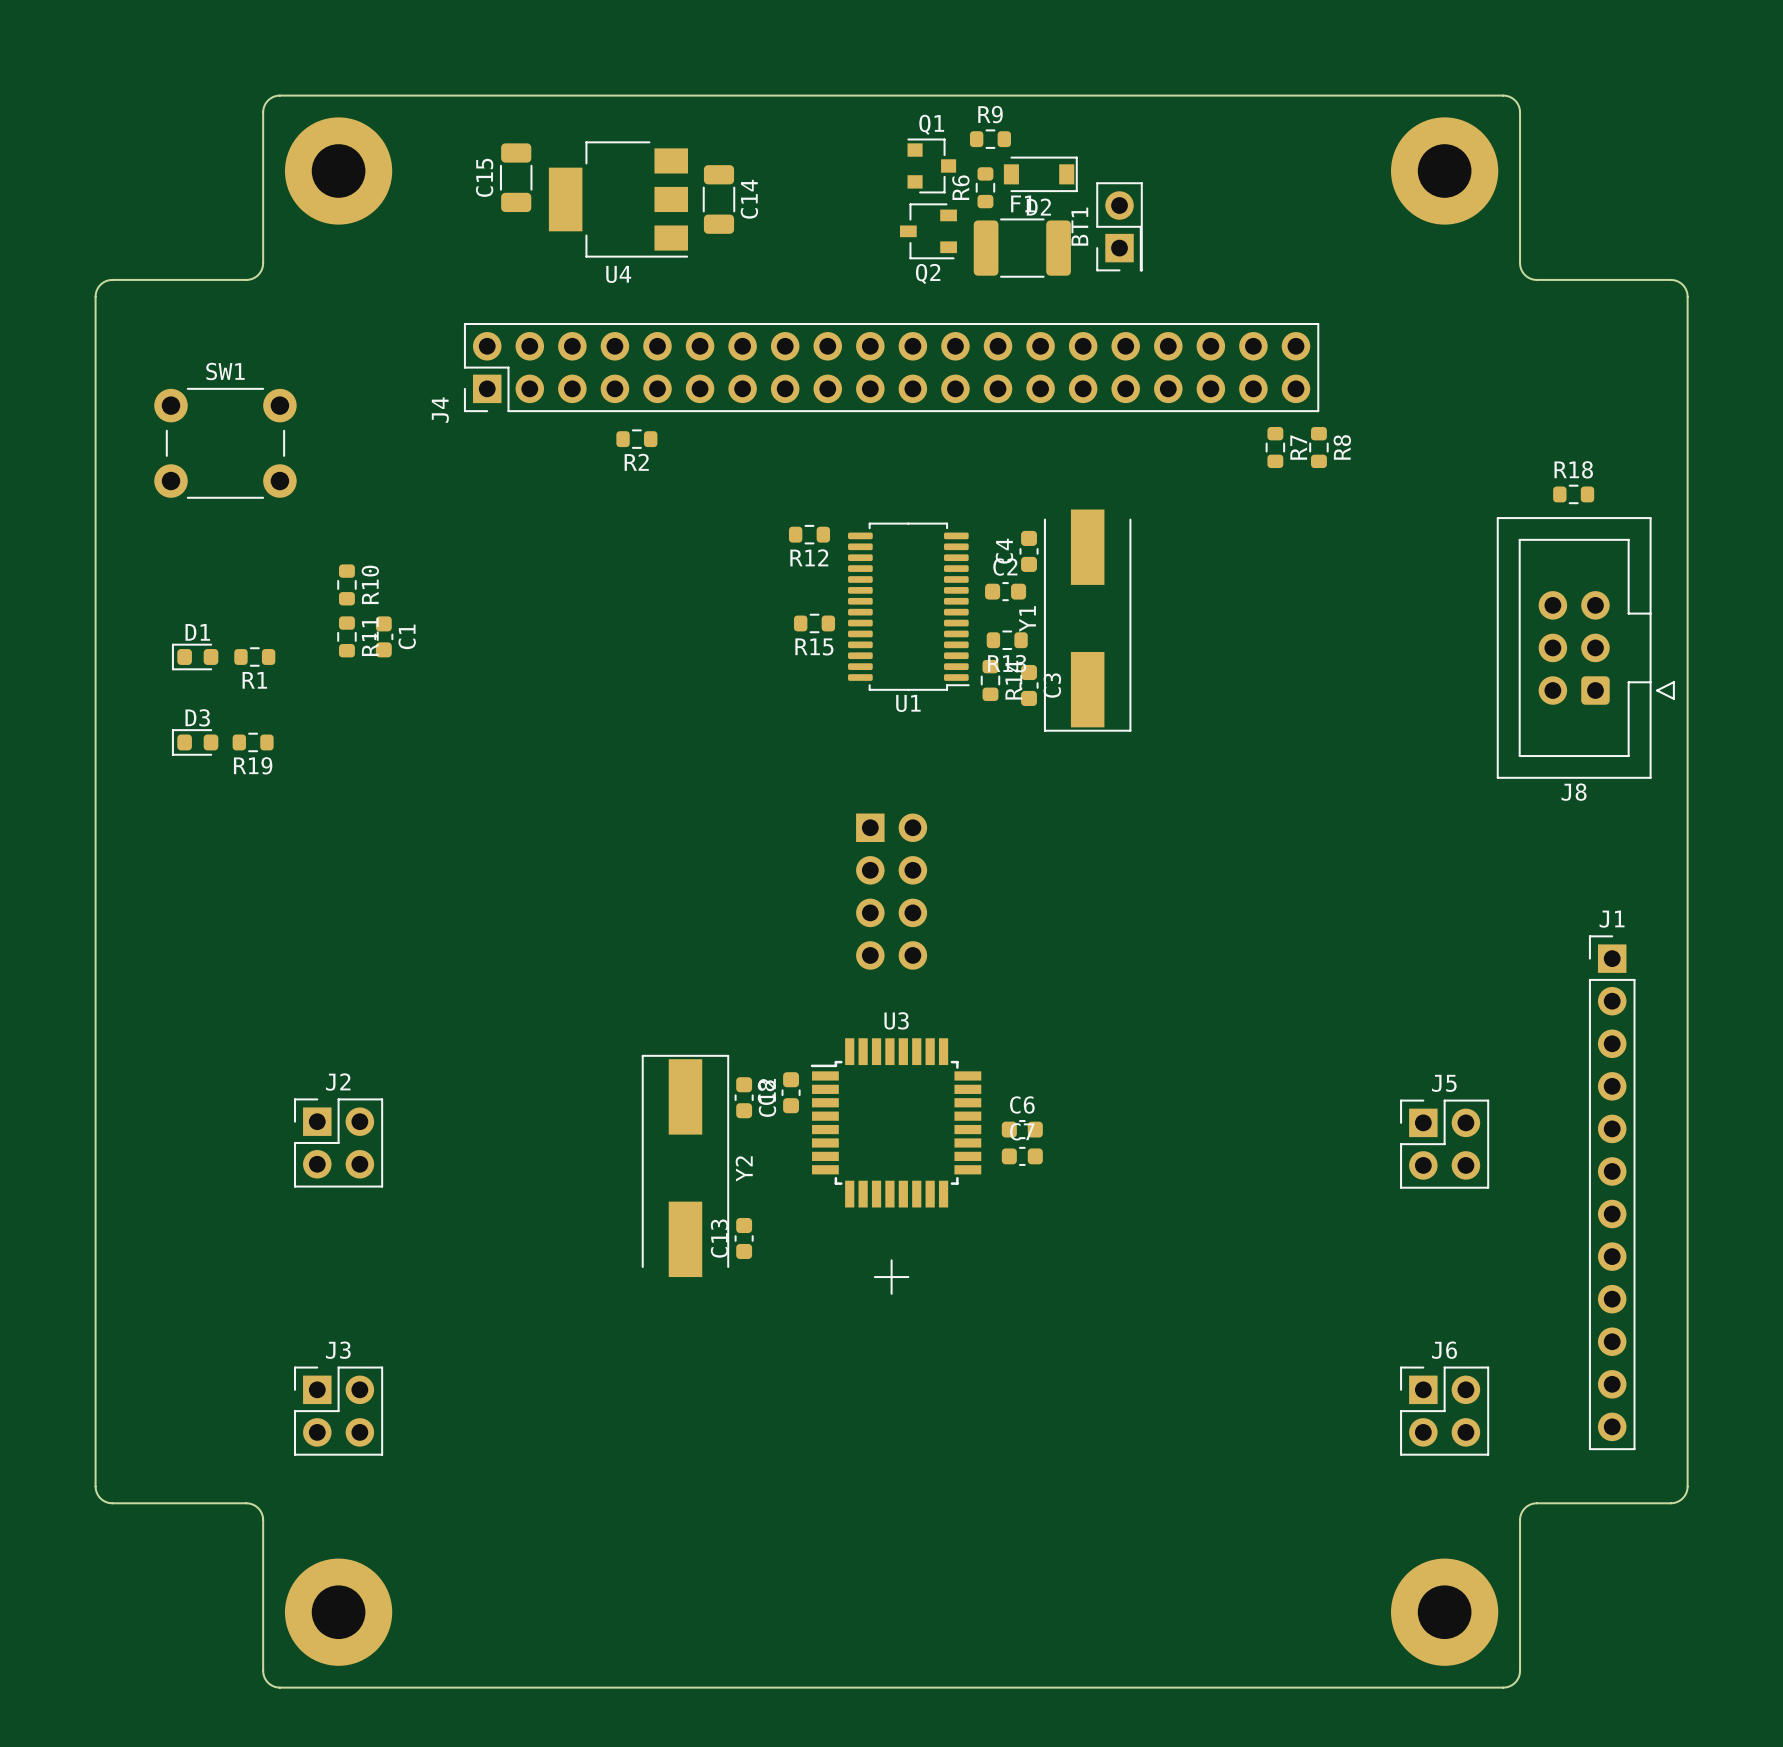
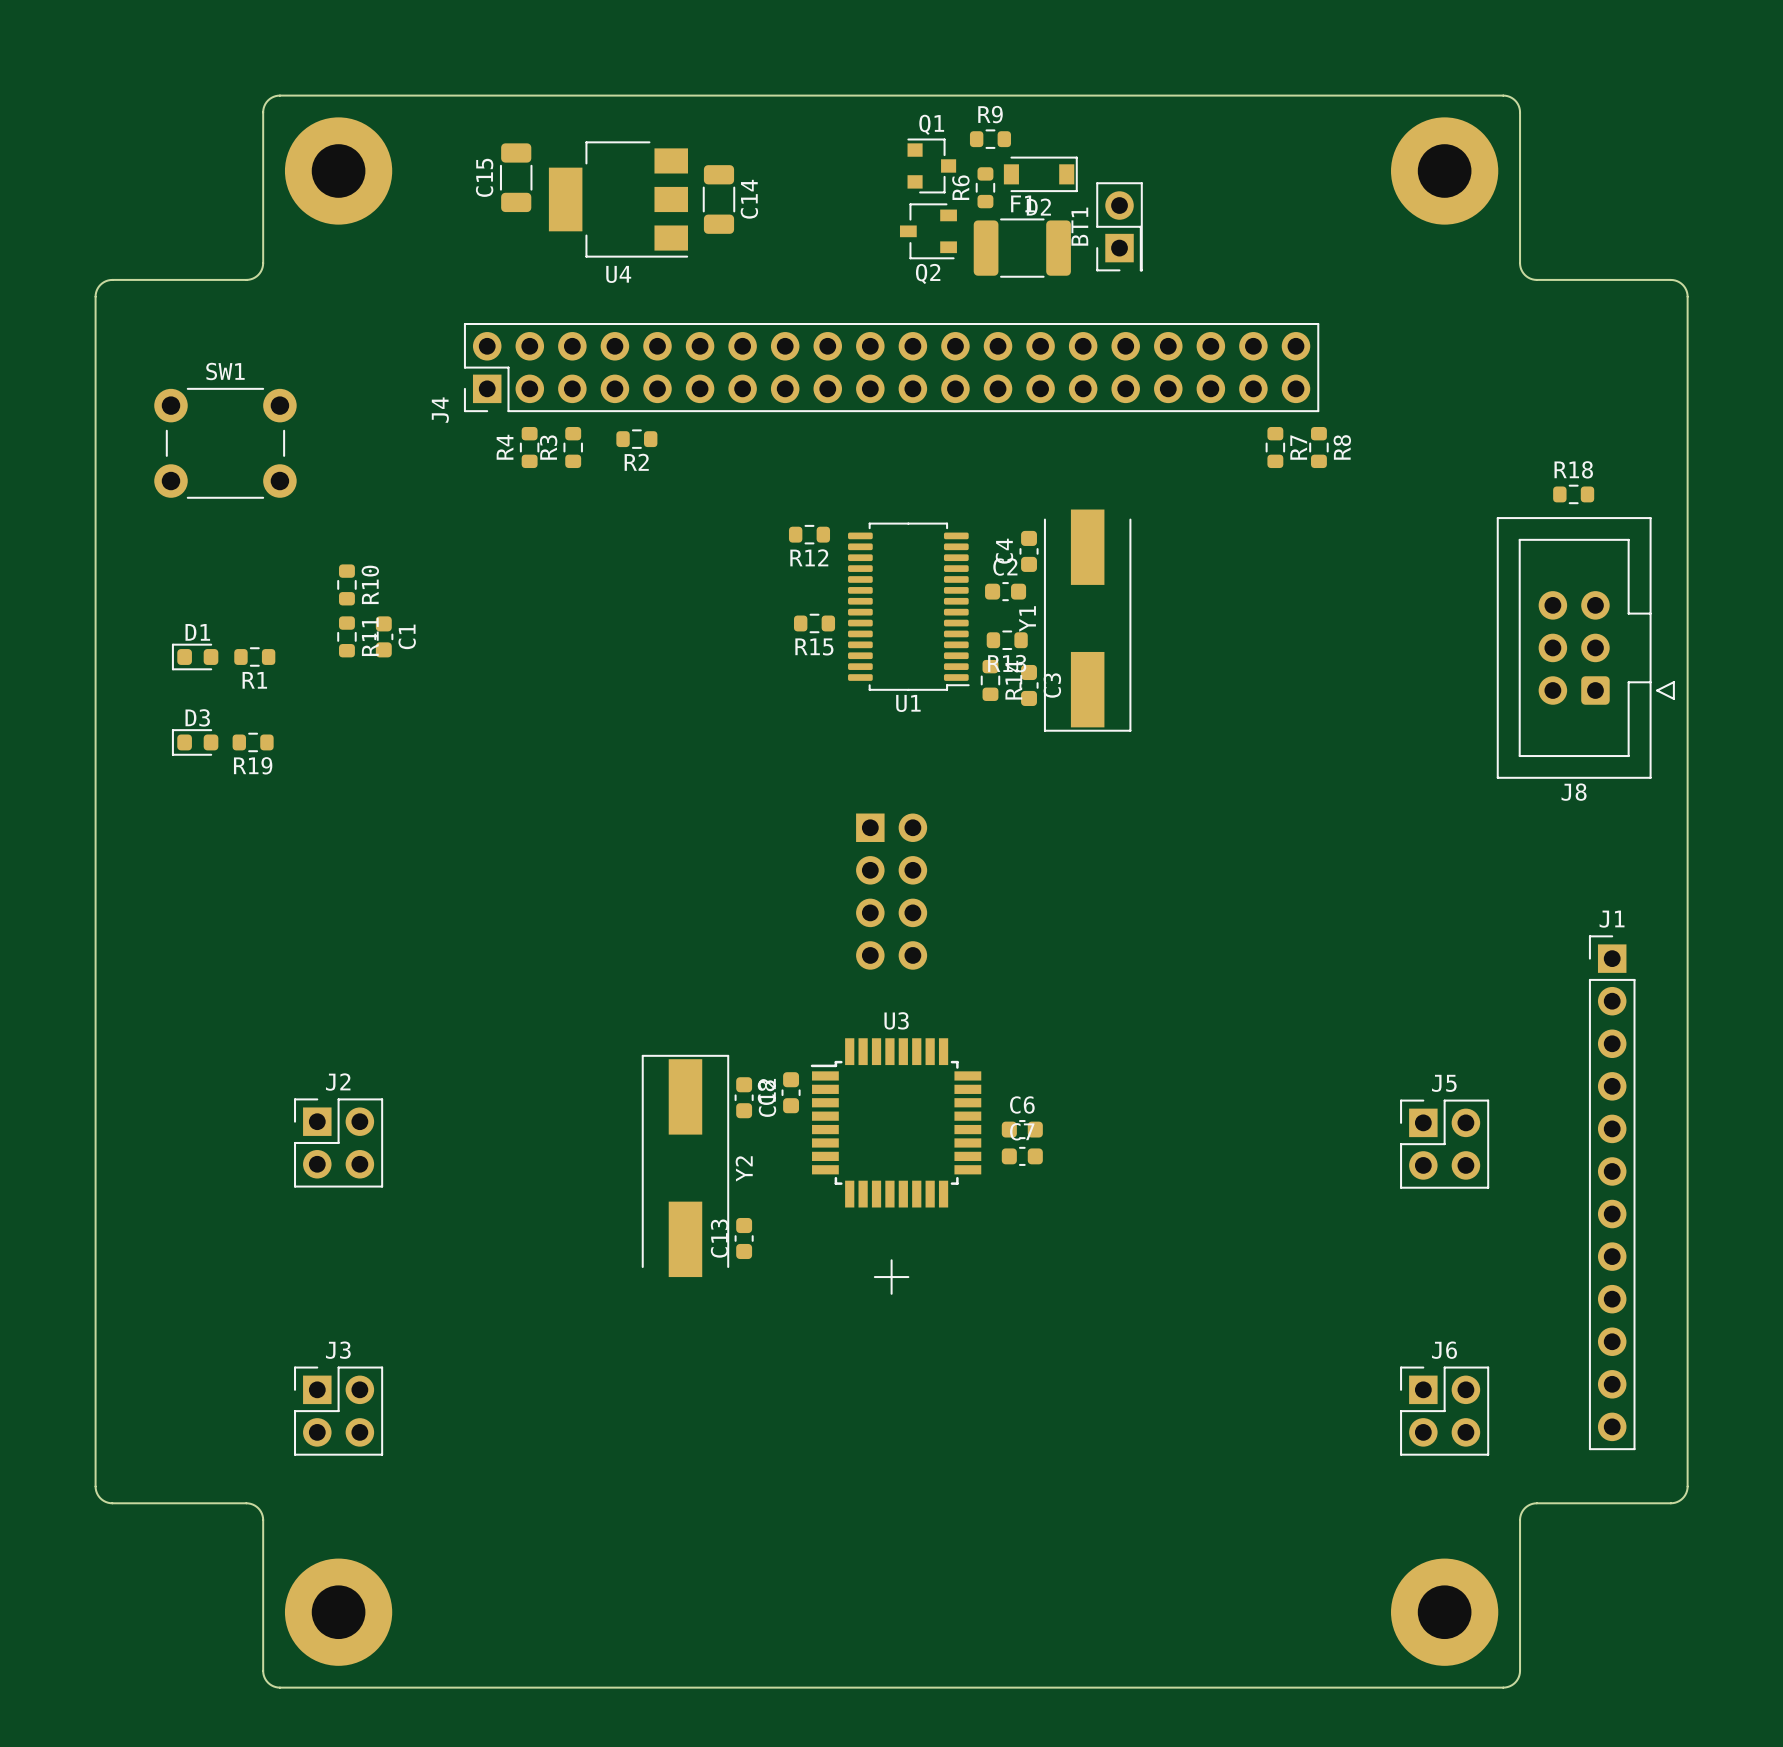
R4: none -> (529, 447)
R3: none -> (573, 447)

